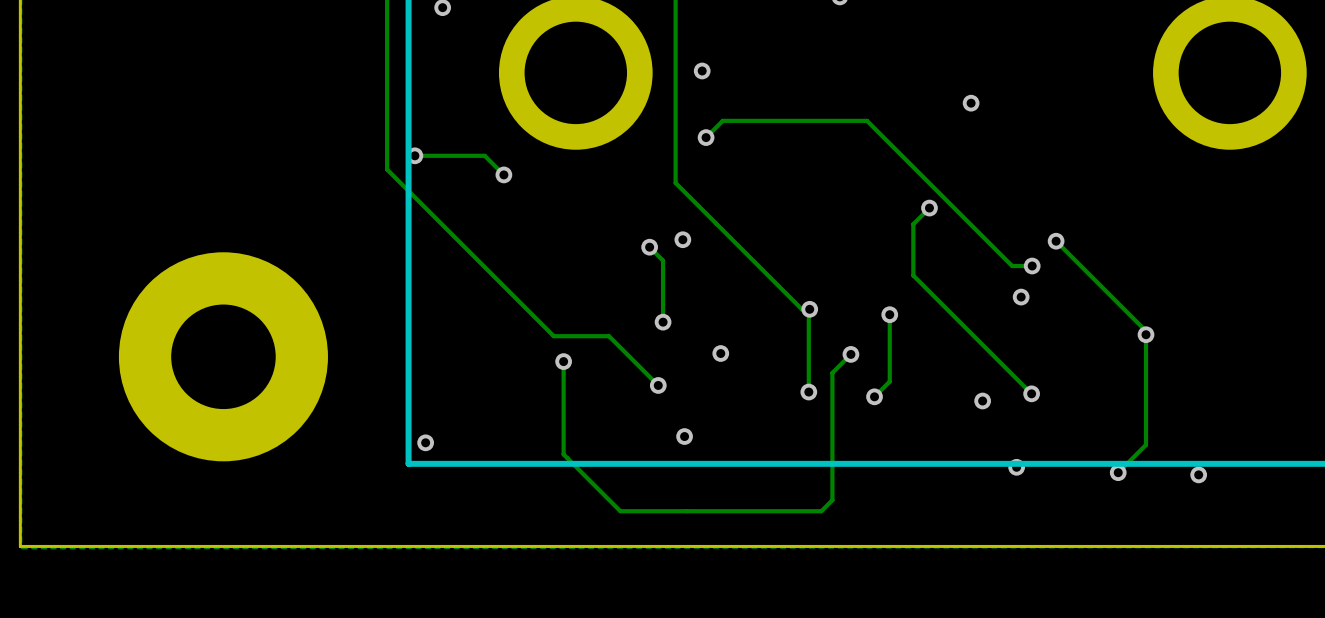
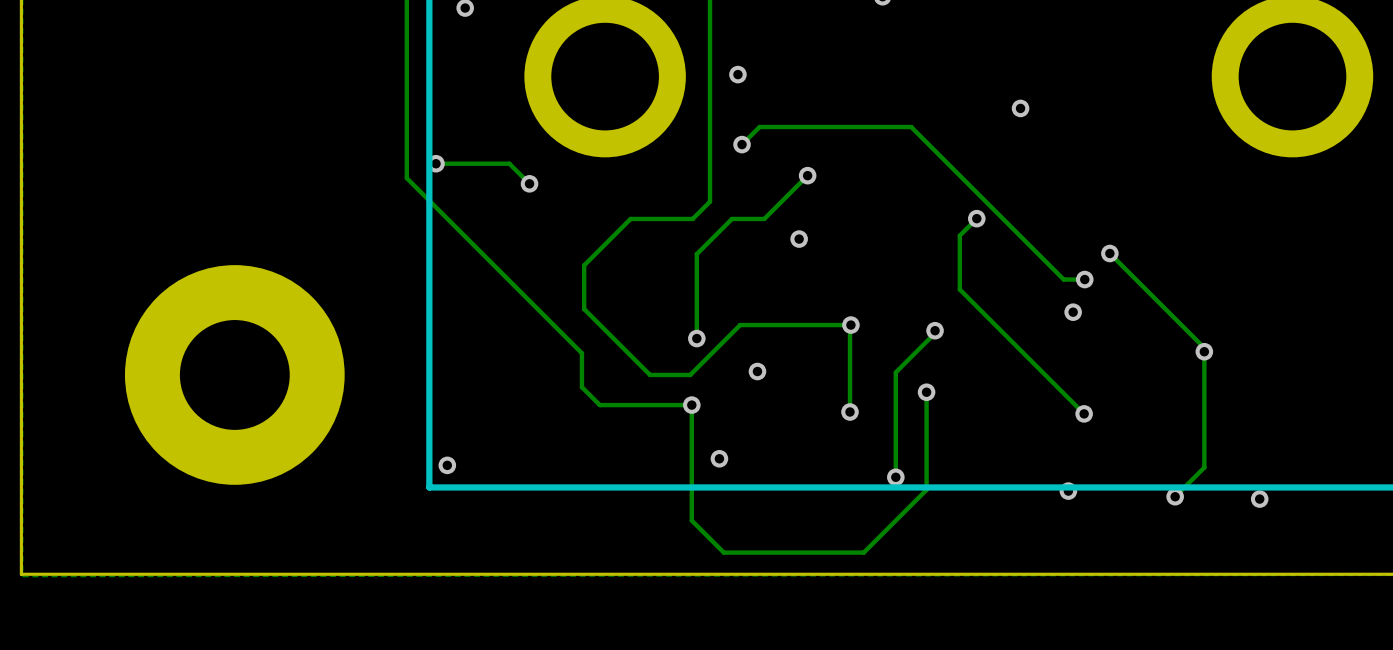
via: none -> (807, 175)
track: (675, 182) (801, 309) -> (710, 192) (710, 201) (692, 218) (630, 218) (584, 265) (584, 309) (650, 374) (690, 374) (740, 325) (842, 325)
via: none -> (799, 239)
via: (682, 239) -> none
track: (649, 247) (663, 260) -> (807, 175) (764, 218) (731, 218) (696, 254) (696, 273)
via: (649, 247) -> none
track: (889, 317) (889, 381) (874, 396) -> (935, 333) (895, 372) (895, 477)
track: (553, 336) (609, 336) (658, 385) -> (581, 353) (581, 387) (599, 405) (691, 405) (691, 520) (723, 552) (863, 552) (926, 489) (926, 392)
track: (850, 354) (832, 372) (832, 500) (821, 511) (620, 511) (563, 454) (563, 361) -> none
via: (850, 354) -> none
via: (563, 361) -> none
via: none -> (926, 392)
via: (874, 396) -> none
via: (982, 401) -> none
via: none -> (895, 477)

